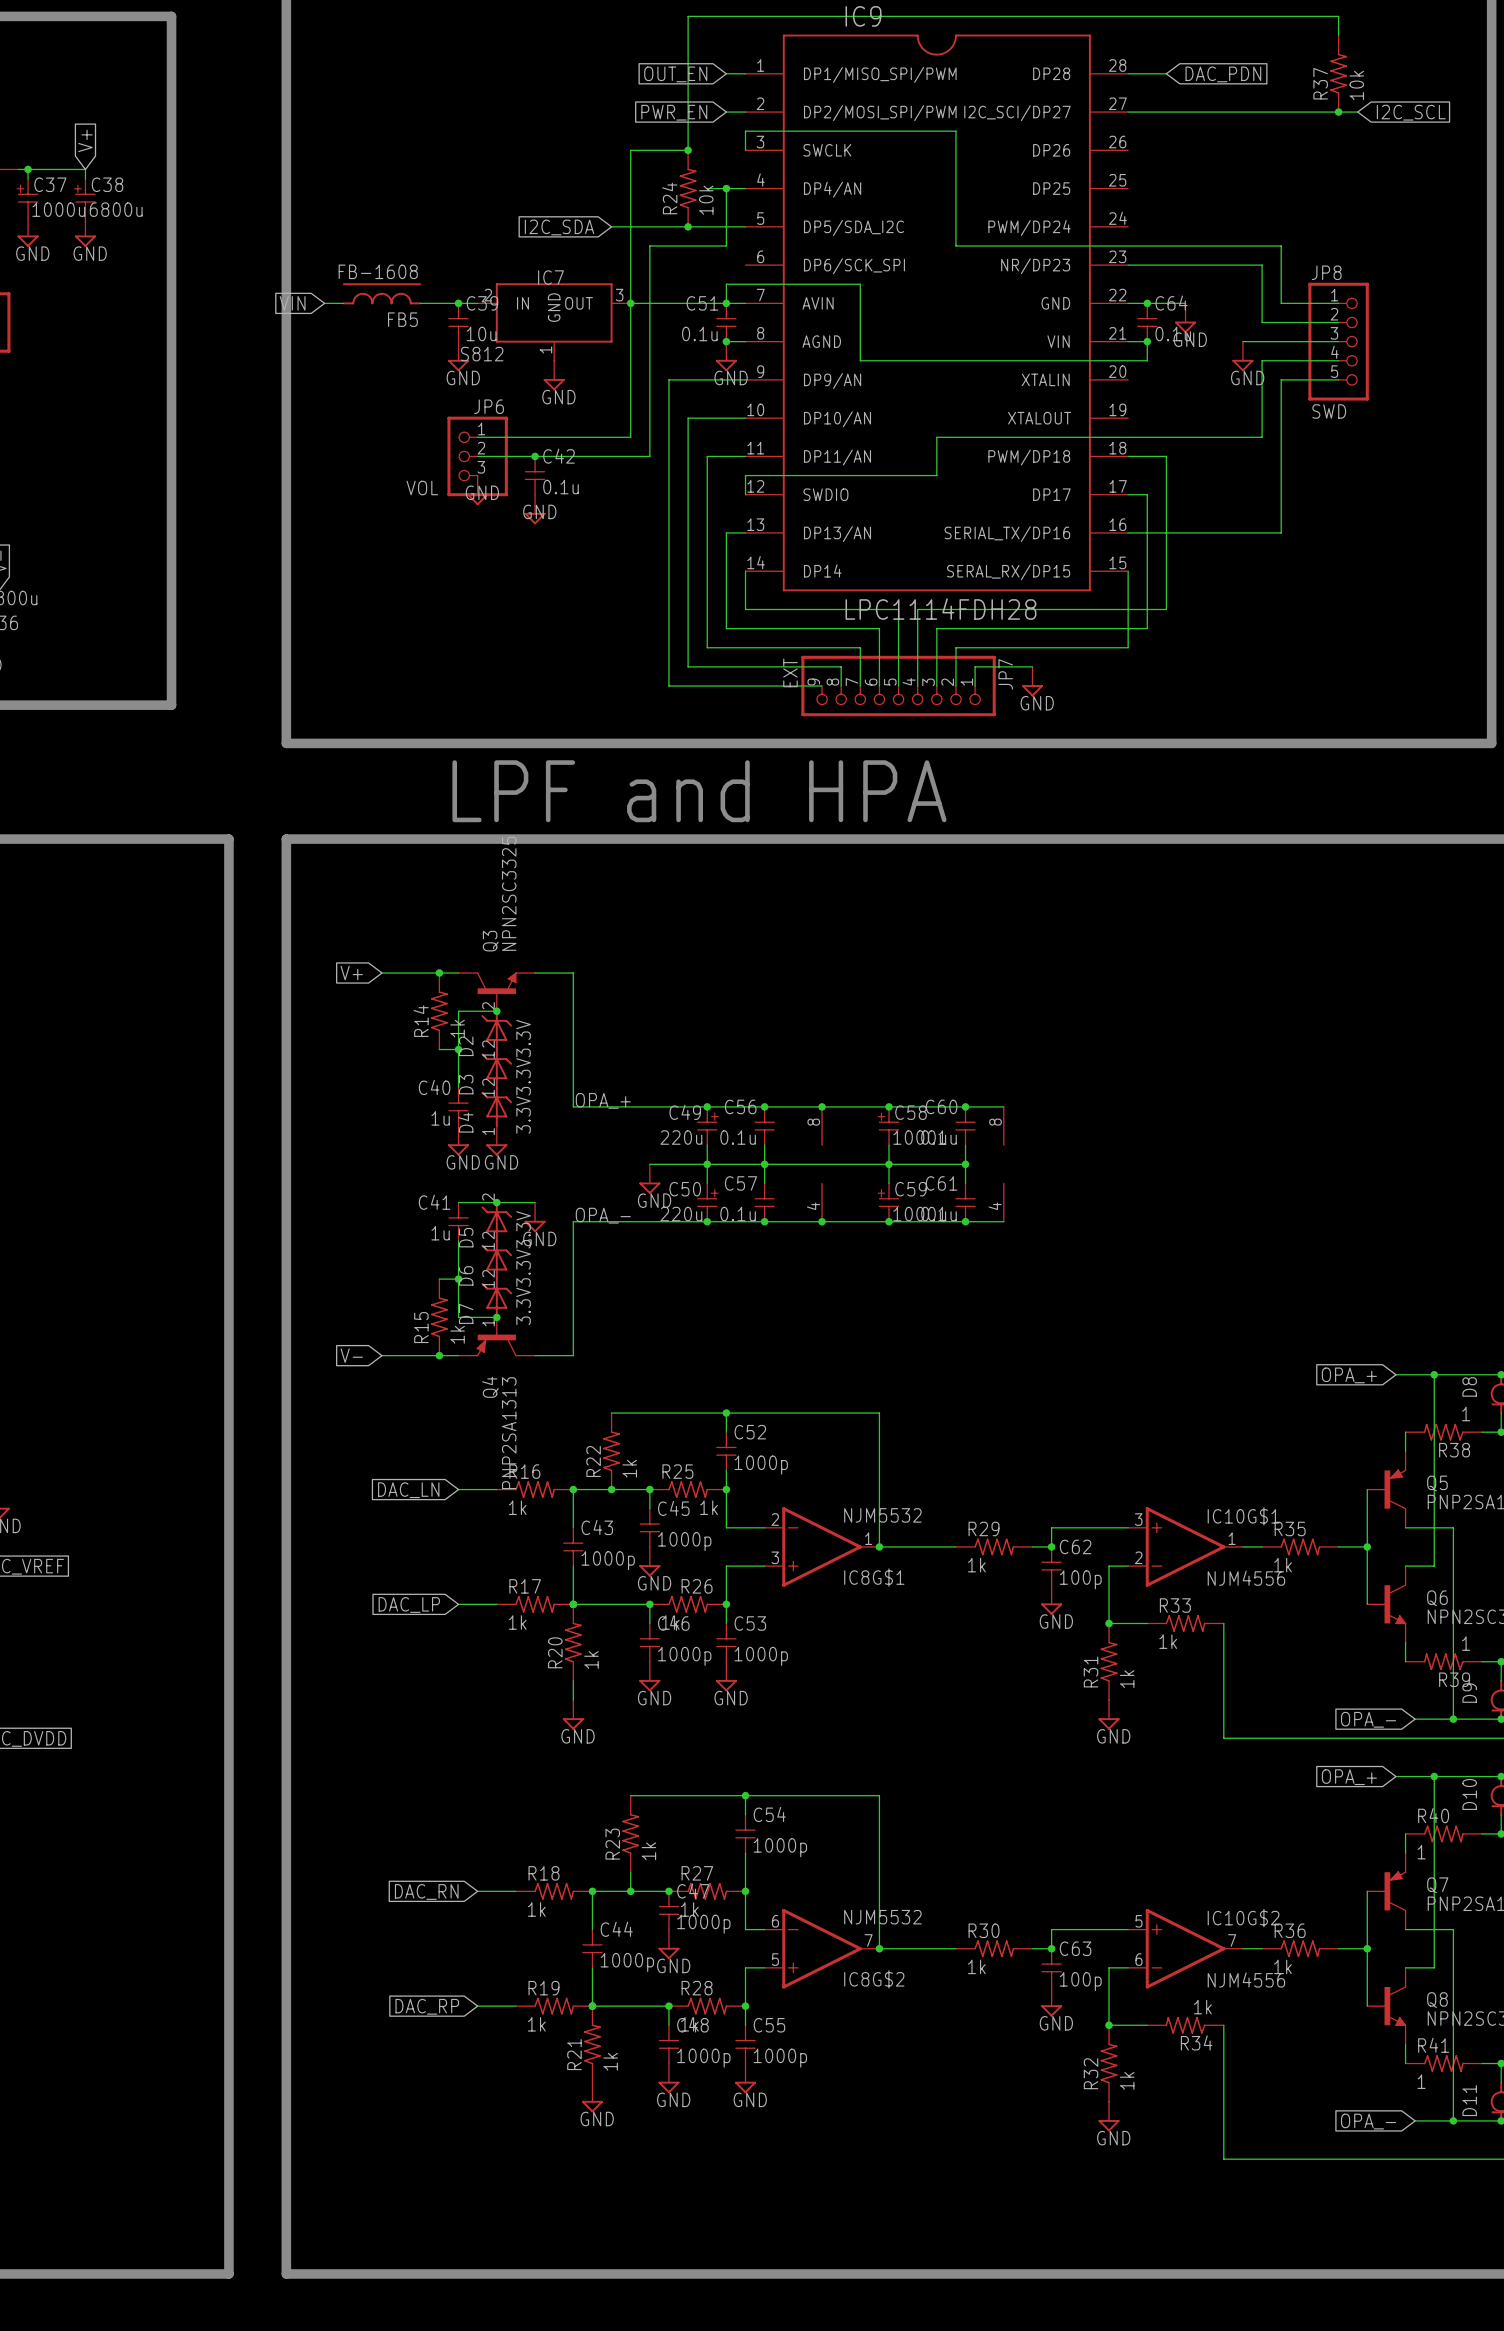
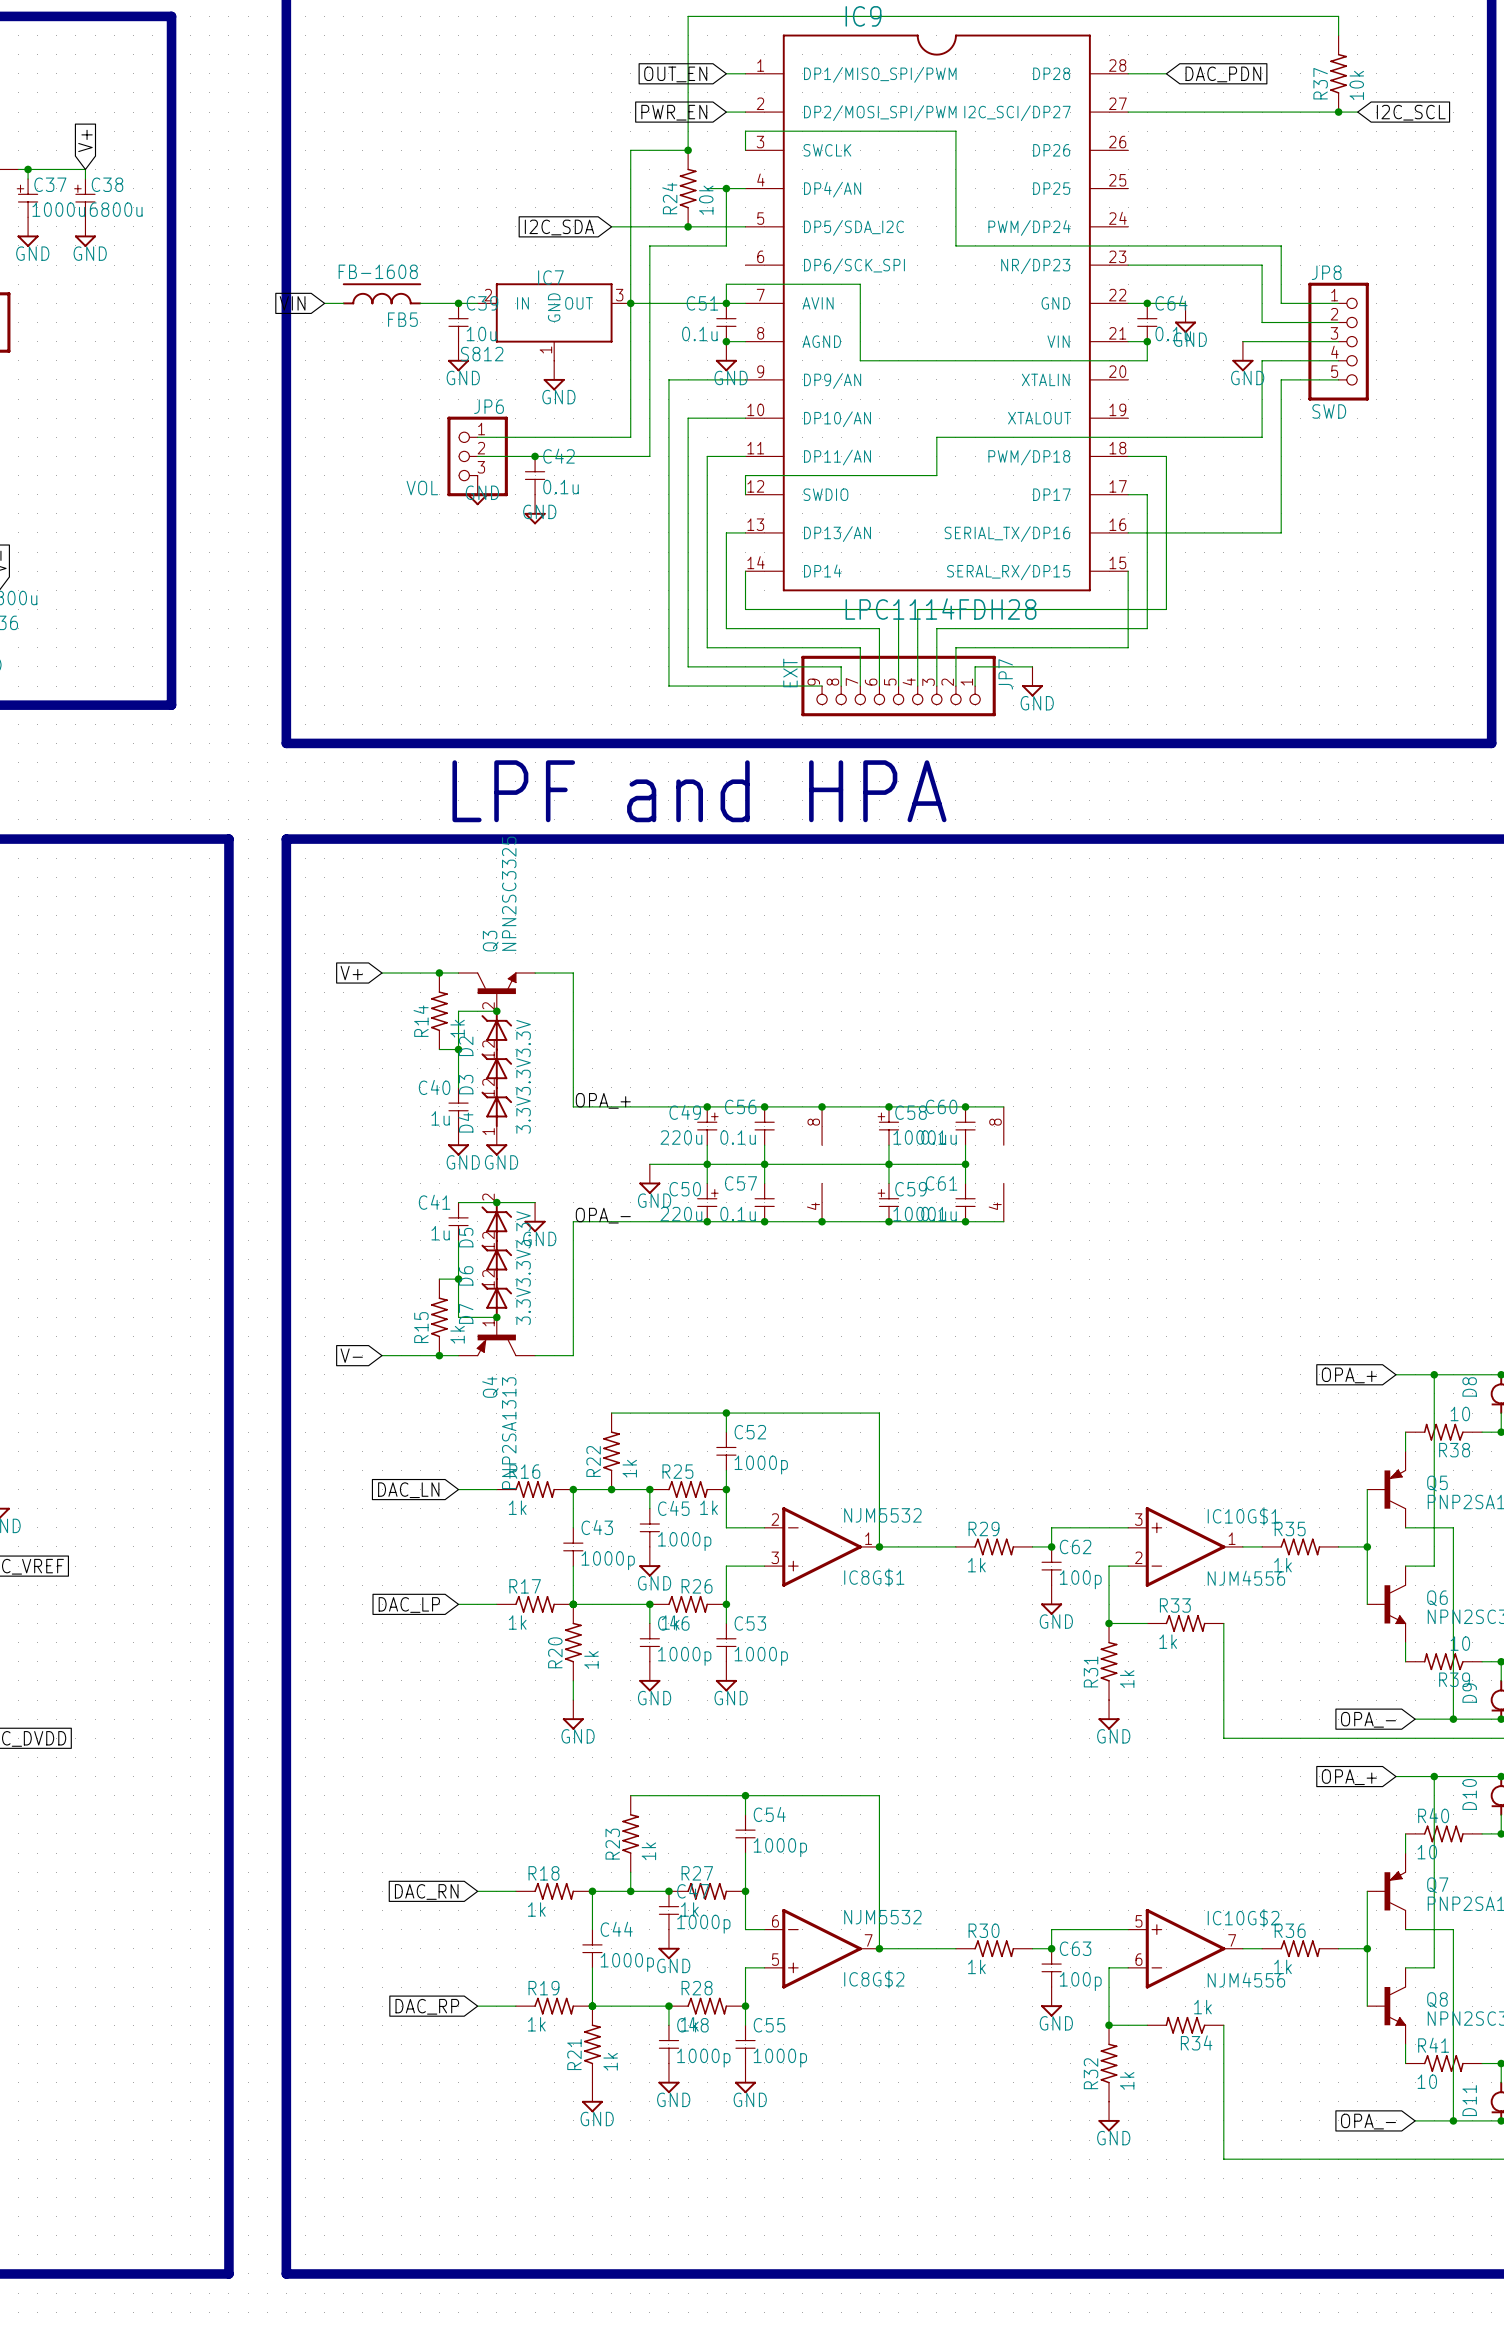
R38 value: 1 (1466, 1413) -> 10 (1460, 1413)
R39 value: 1 (1466, 1643) -> 10 (1460, 1643)
R40 value: 1 (1421, 1852) -> 10 (1427, 1852)
R41 value: 1 (1421, 2081) -> 10 (1427, 2081)

